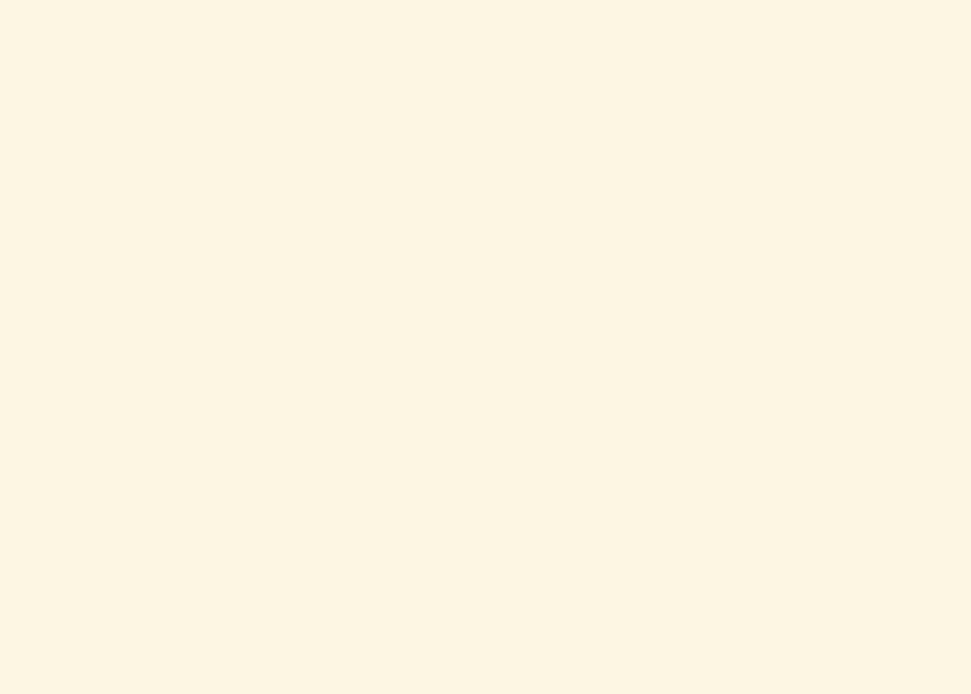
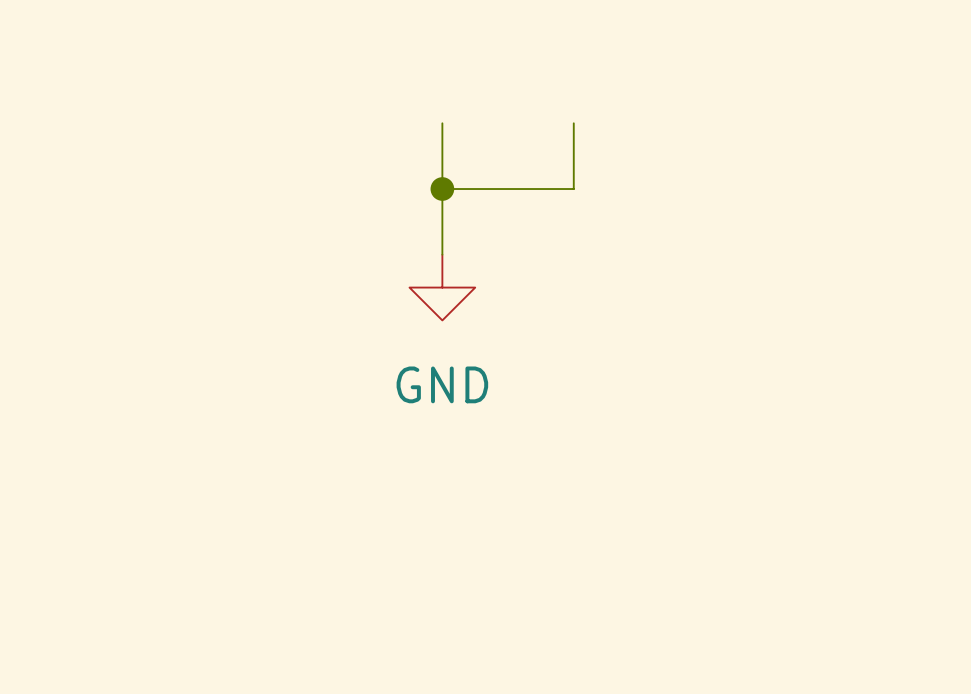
wire: none -> (442, 123) (442, 254)
wire: none -> (573, 123) (573, 189) (442, 189)
junction: none -> (442, 189)
power symbol: none -> GND (442, 287)

